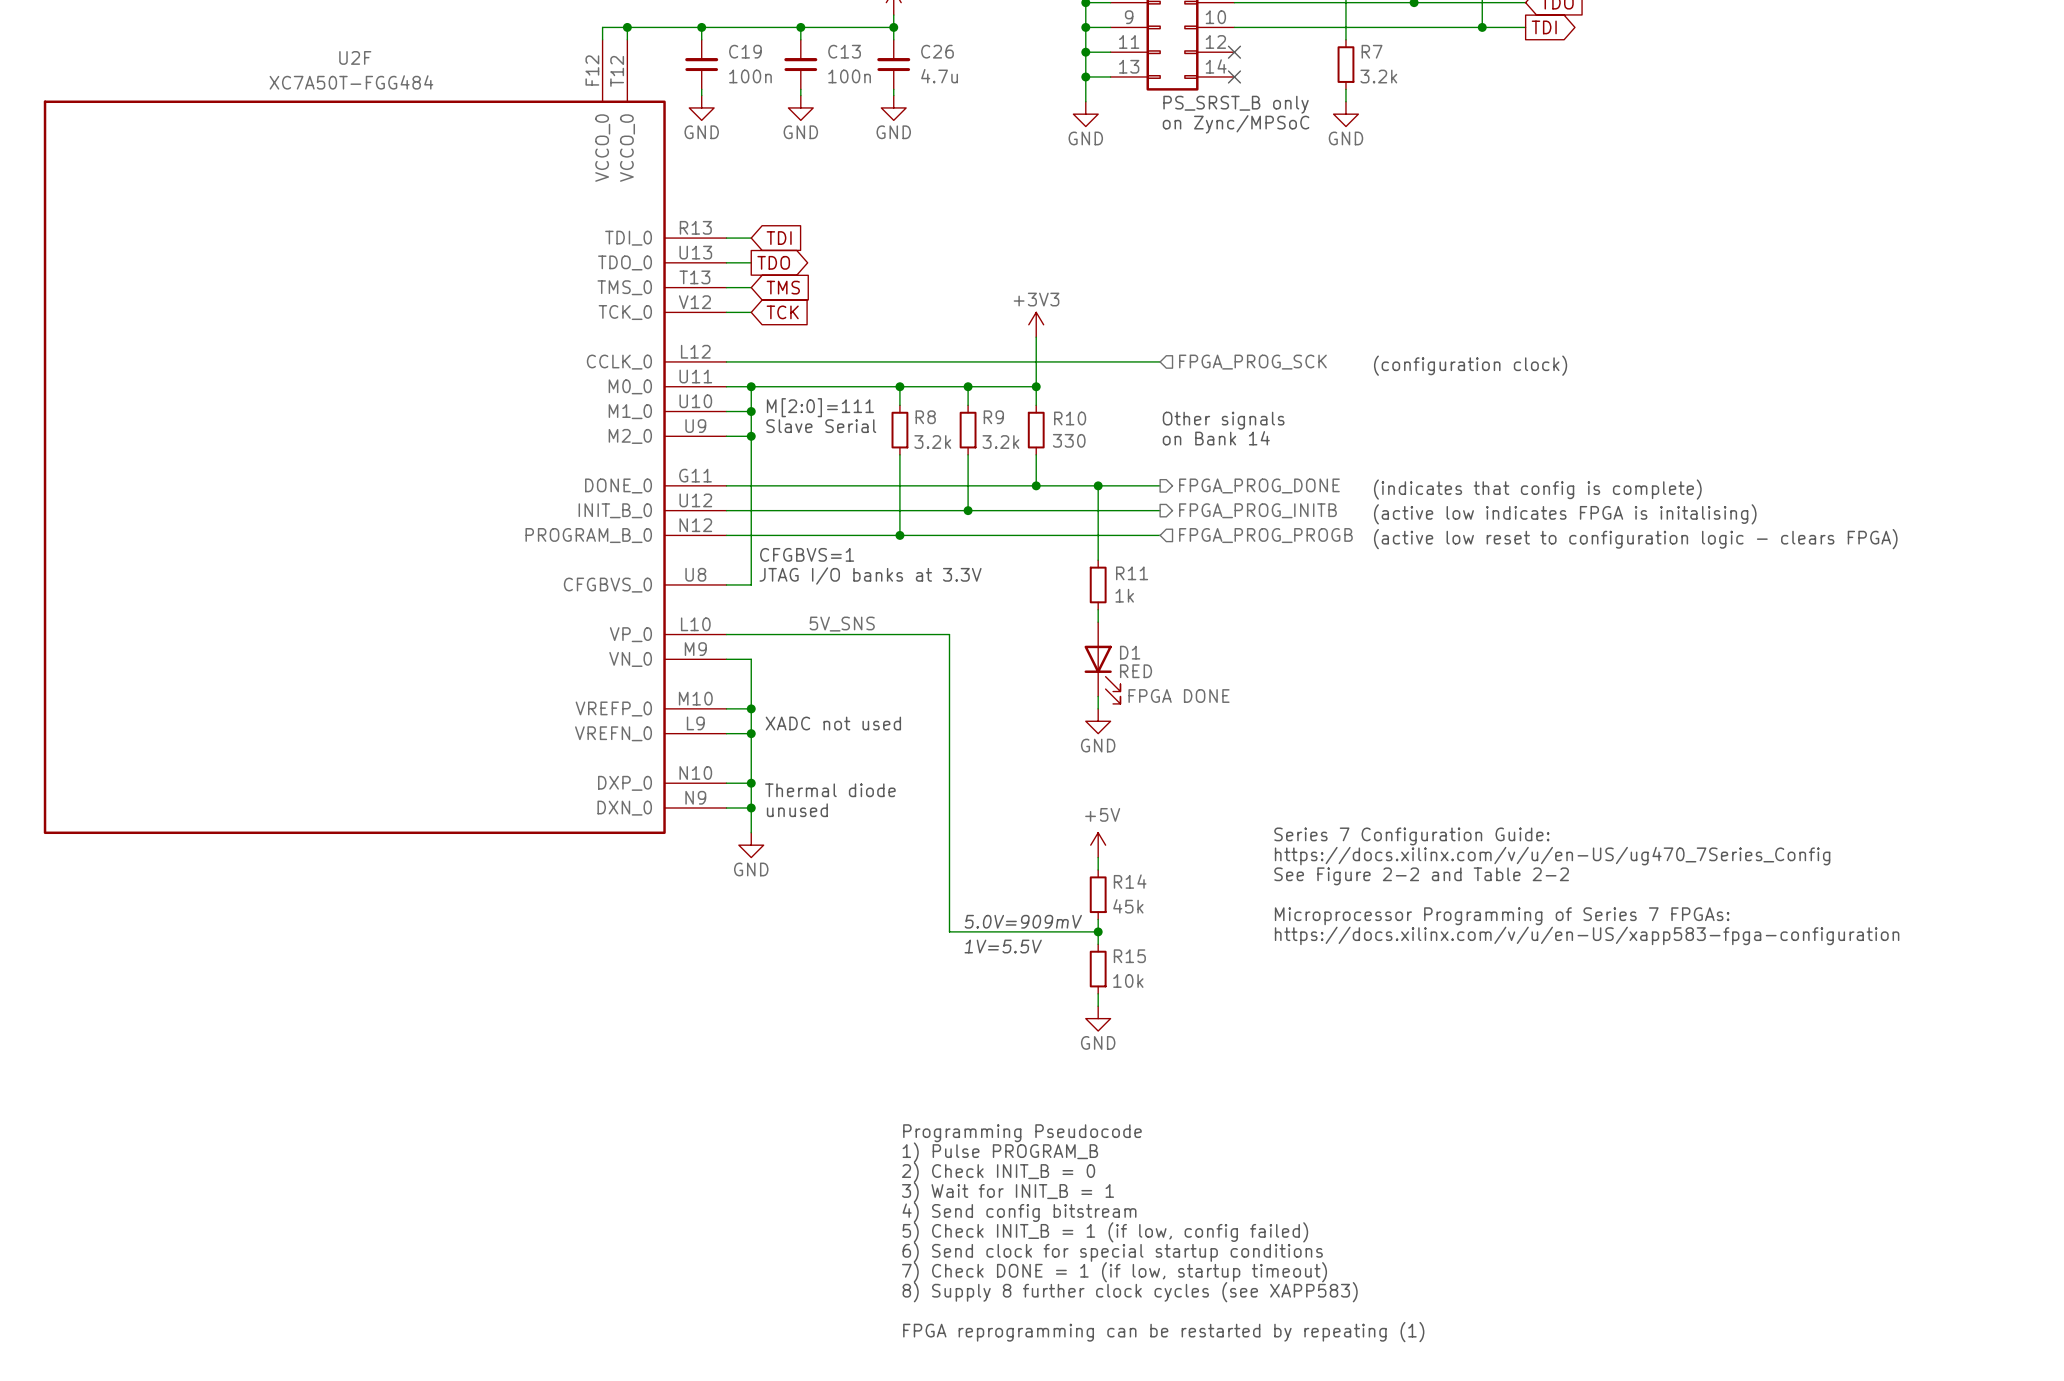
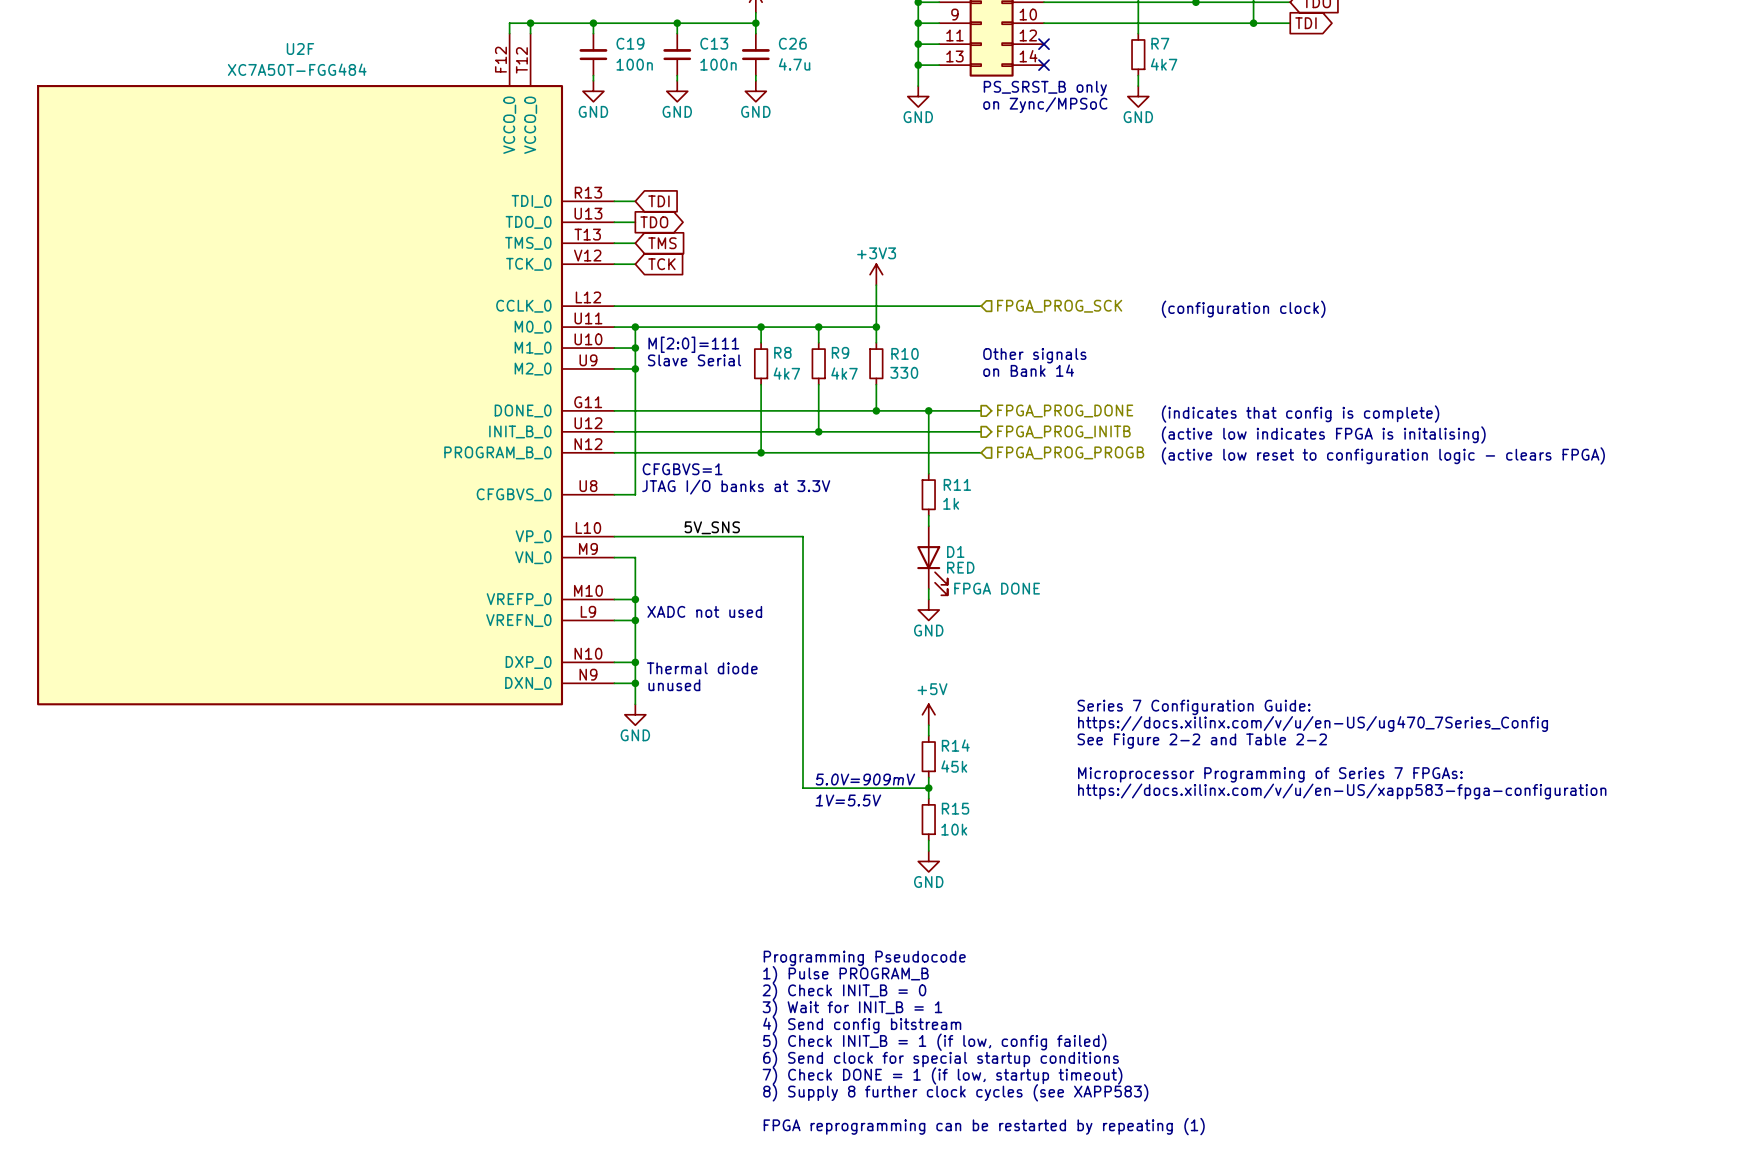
R7 value: 3.2k (1378, 76) -> 4k7 (1164, 64)
R8 value: 3.2k (932, 442) -> 4k7 (786, 373)
R9 value: 3.2k (1000, 442) -> 4k7 (844, 373)

